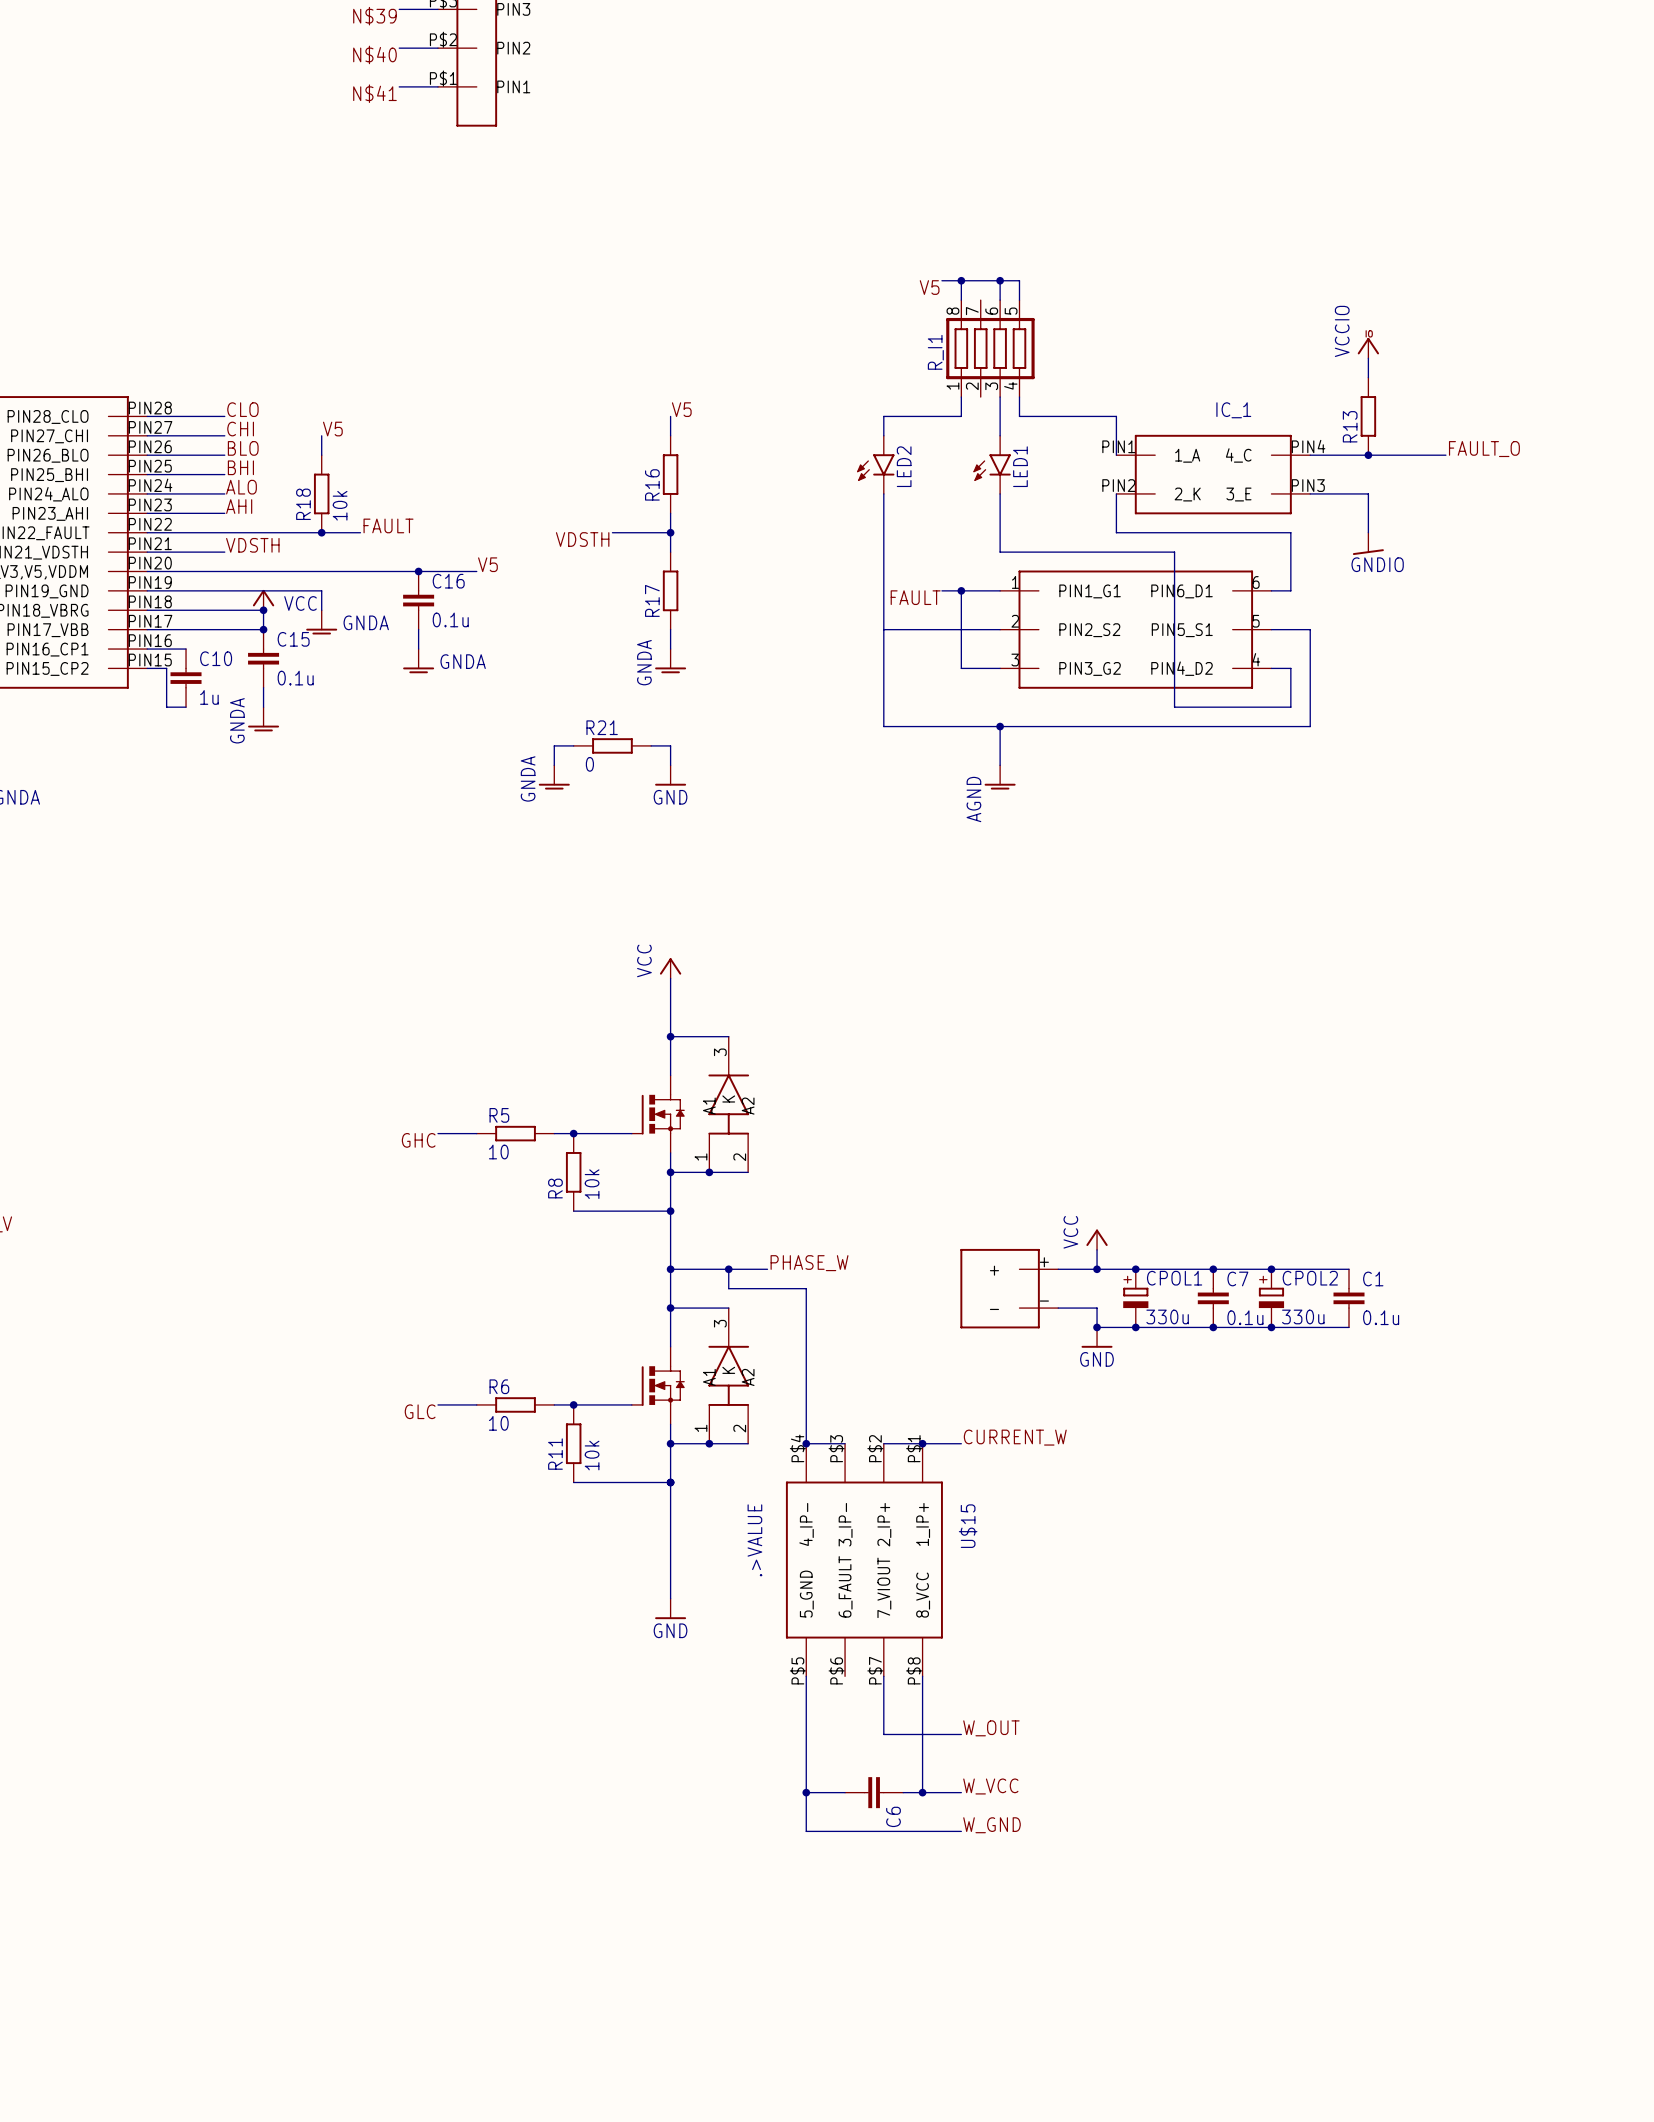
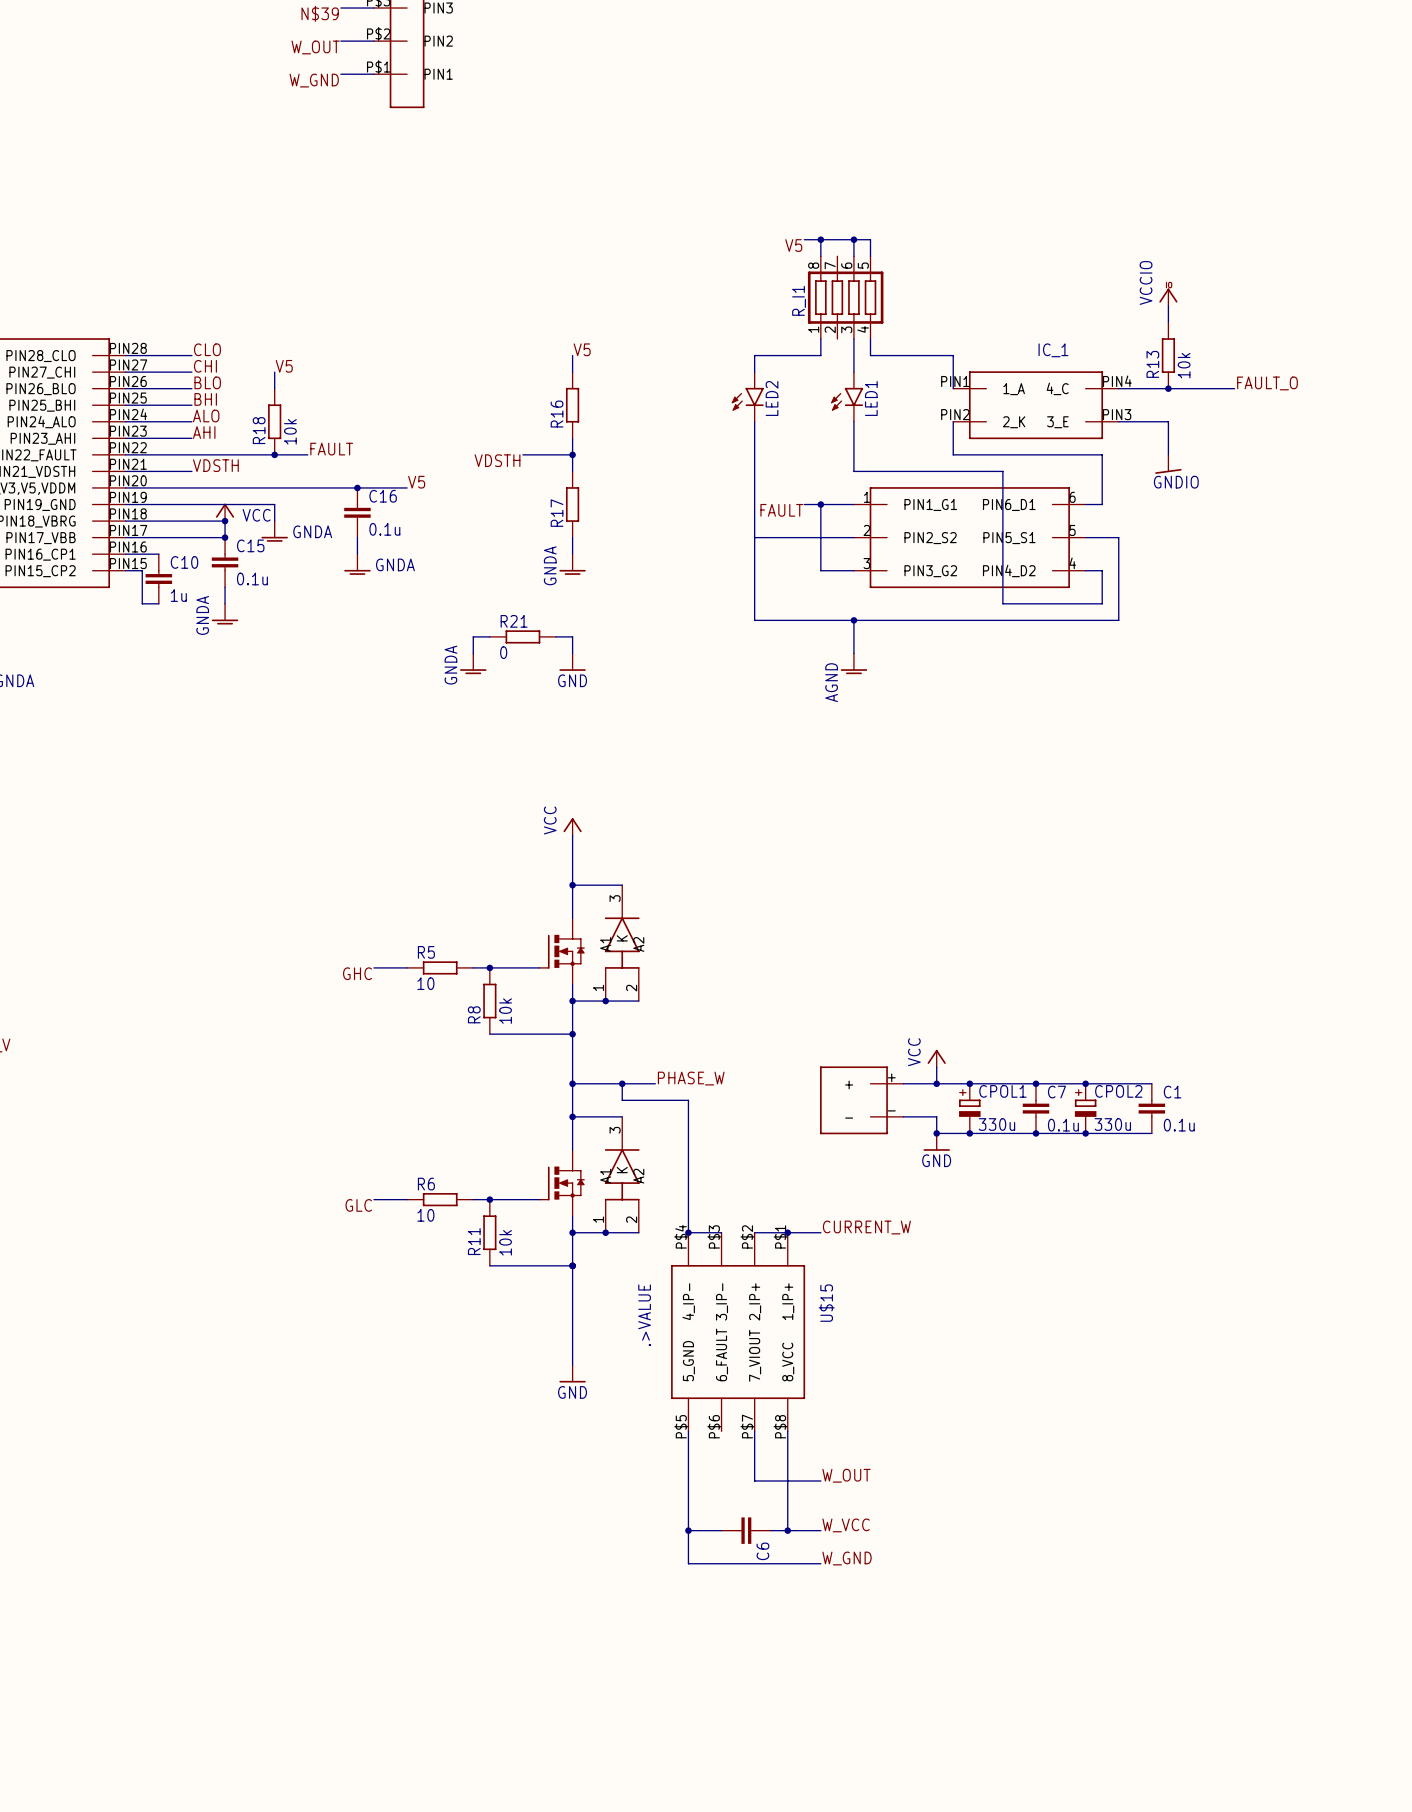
label: N$40 (374, 54) -> W_OUT (315, 47)
label: N$41 (374, 93) -> W_GND (314, 80)
R13 value: none -> 10k (1184, 365)

